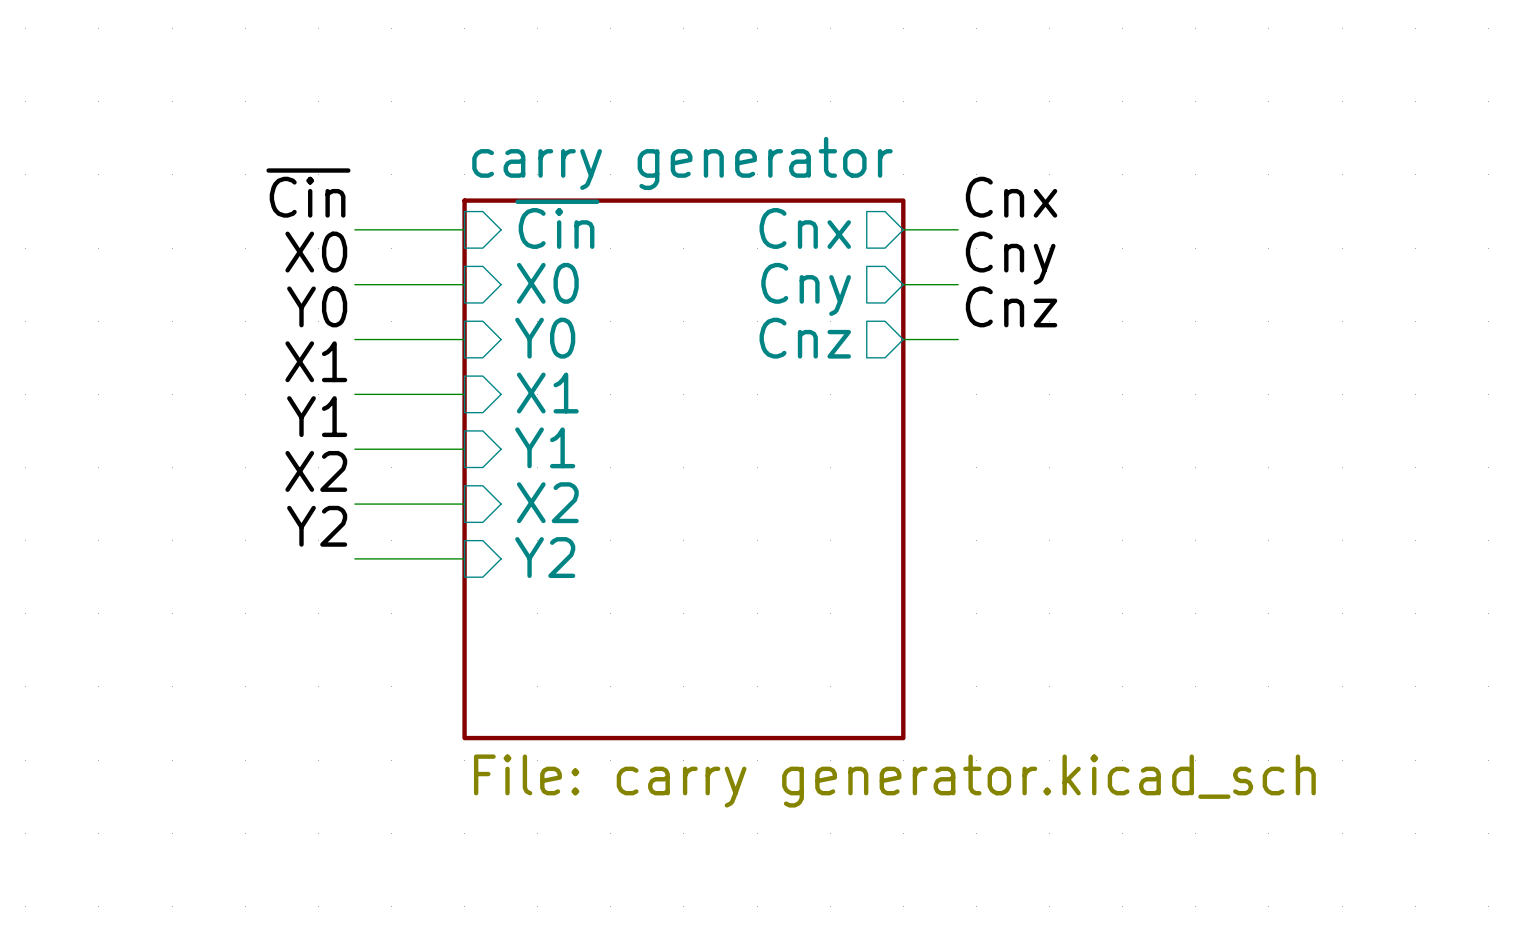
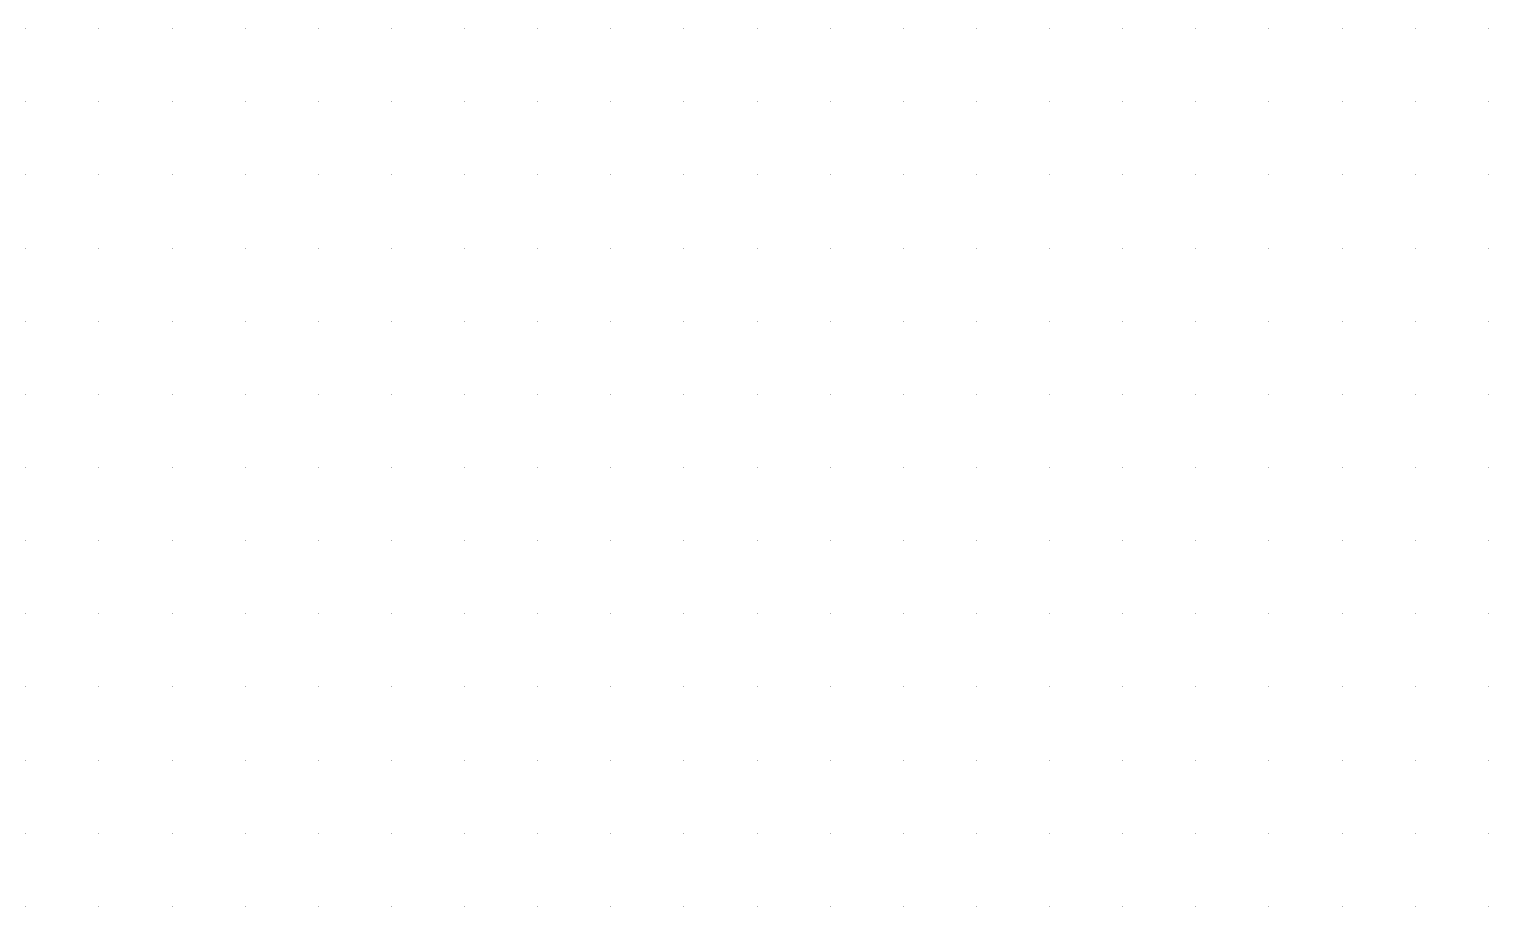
label: ~{Cin} (308, 193) -> none
label: Cnx (1011, 197) -> none
sheet pin: ~{Cin} (557, 224) -> none
sheet pin: Cnx (805, 228) -> none
wire: (354, 229) (464, 229) -> none
wire: (903, 229) (958, 229) -> none
label: X0 (316, 252) -> none
label: Cny (1010, 258) -> none
sheet pin: X0 (547, 283) -> none
wire: (354, 284) (464, 284) -> none
wire: (903, 284) (958, 284) -> none
sheet pin: Cny (806, 289) -> none
label: Y0 (317, 306) -> none
label: Cnz (1011, 306) -> none
sheet pin: Y0 (545, 338) -> none
sheet pin: Cnz (805, 338) -> none
wire: (354, 339) (464, 339) -> none
wire: (903, 339) (958, 339) -> none
label: X1 (316, 361) -> none
sheet pin: X1 (547, 393) -> none
wire: (354, 394) (464, 394) -> none
label: Y1 (317, 416) -> none
sheet pin: Y1 (545, 447) -> none
wire: (354, 449) (464, 449) -> none
sheet carry generator: File: carry generator.kicad_sch (683, 469) -> none
label: X2 (316, 471) -> none
sheet pin: X2 (547, 502) -> none
wire: (354, 504) (464, 504) -> none
label: Y2 (317, 526) -> none
sheet pin: Y2 (545, 557) -> none
wire: (354, 558) (464, 558) -> none

